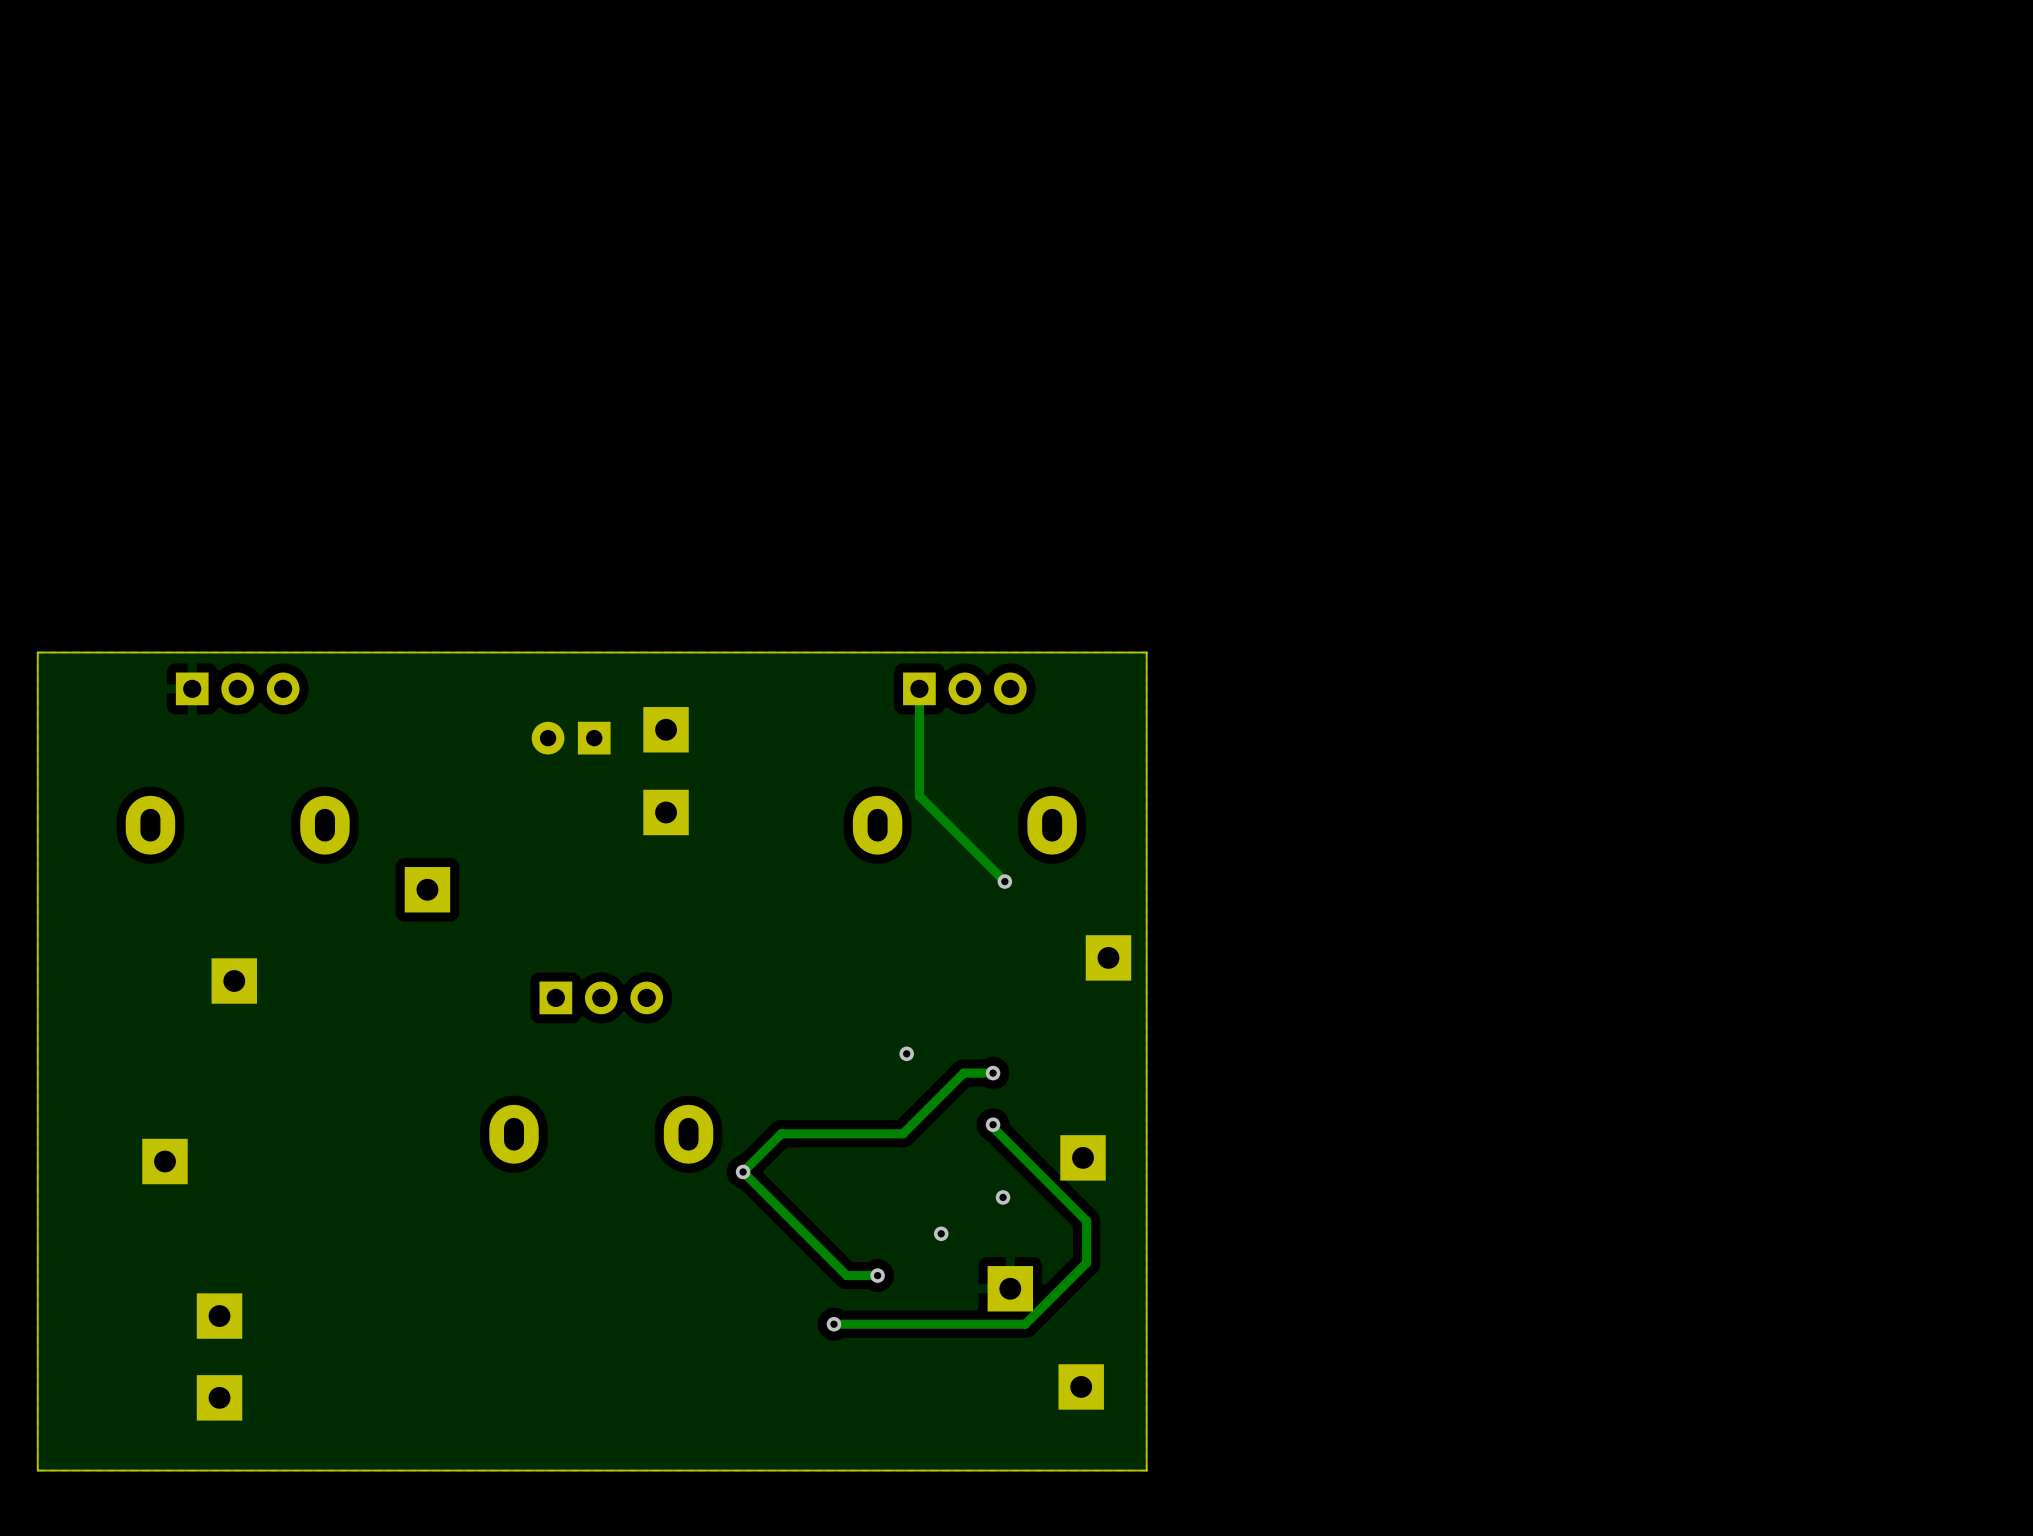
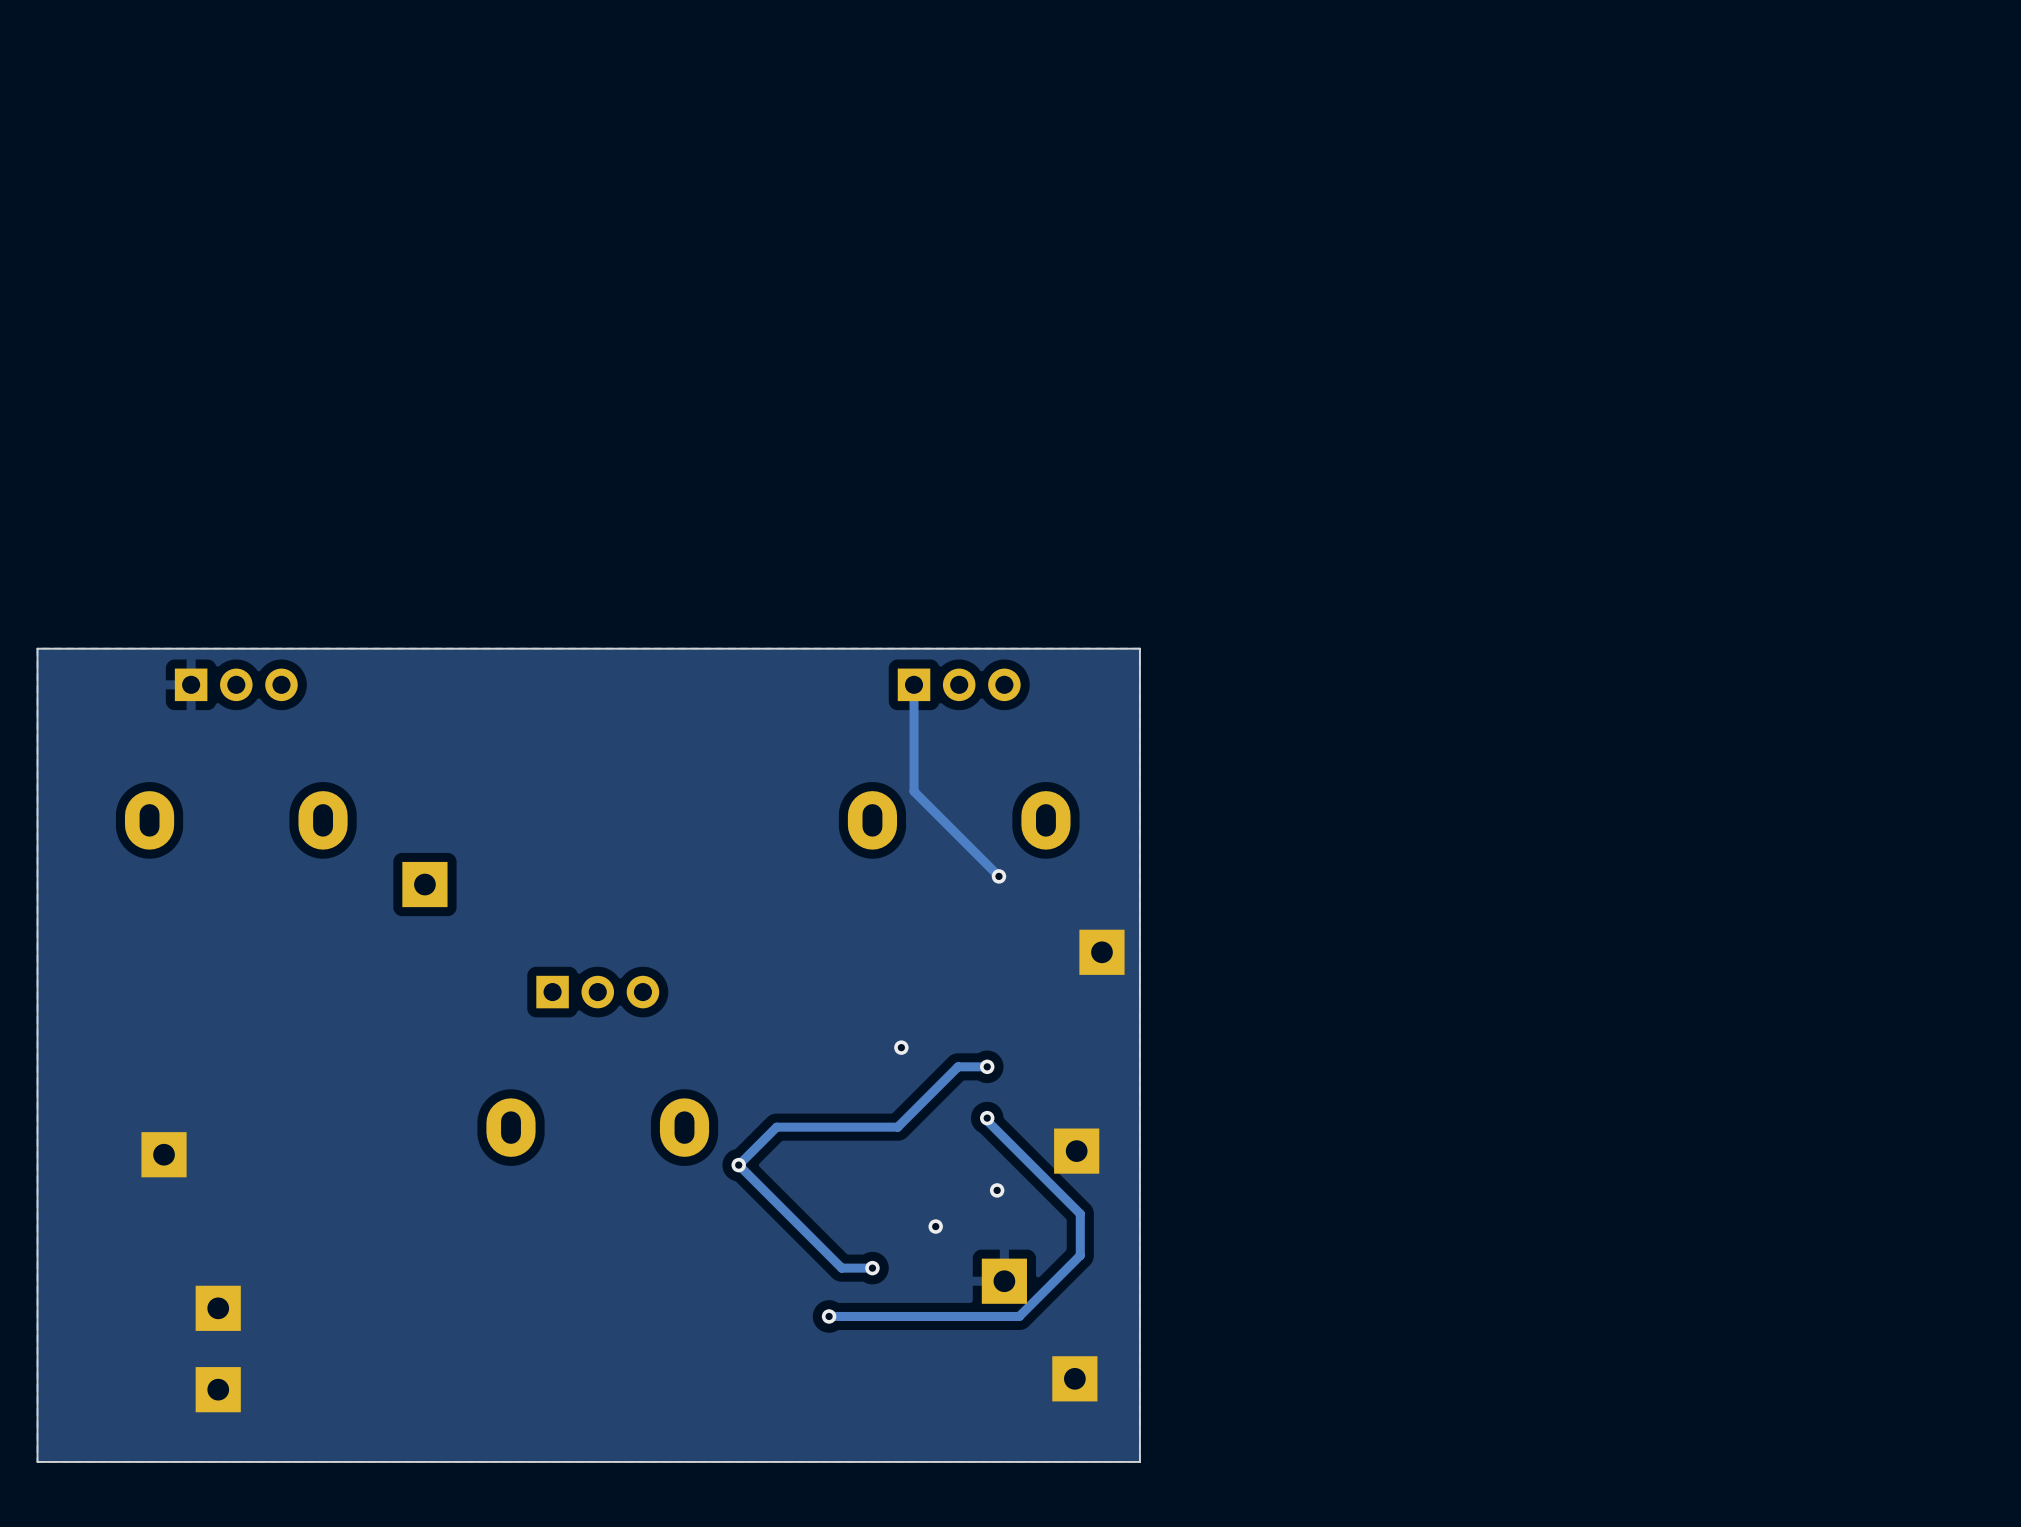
part: (666, 729) -> none
part: (571, 738) -> none
part: (666, 812) -> none
part: (234, 981) -> none

